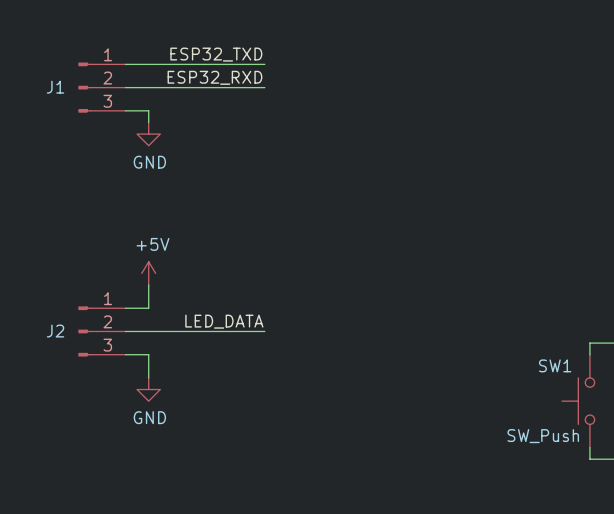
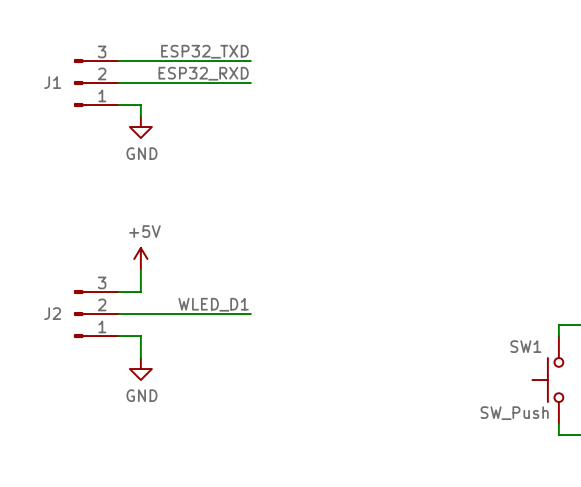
J1 flip: as is (84, 87) -> up-down (80, 83)
label: LED_DATA (224, 321) -> WLED_D1 (213, 304)
J2 flip: as is (84, 331) -> up-down (80, 314)

